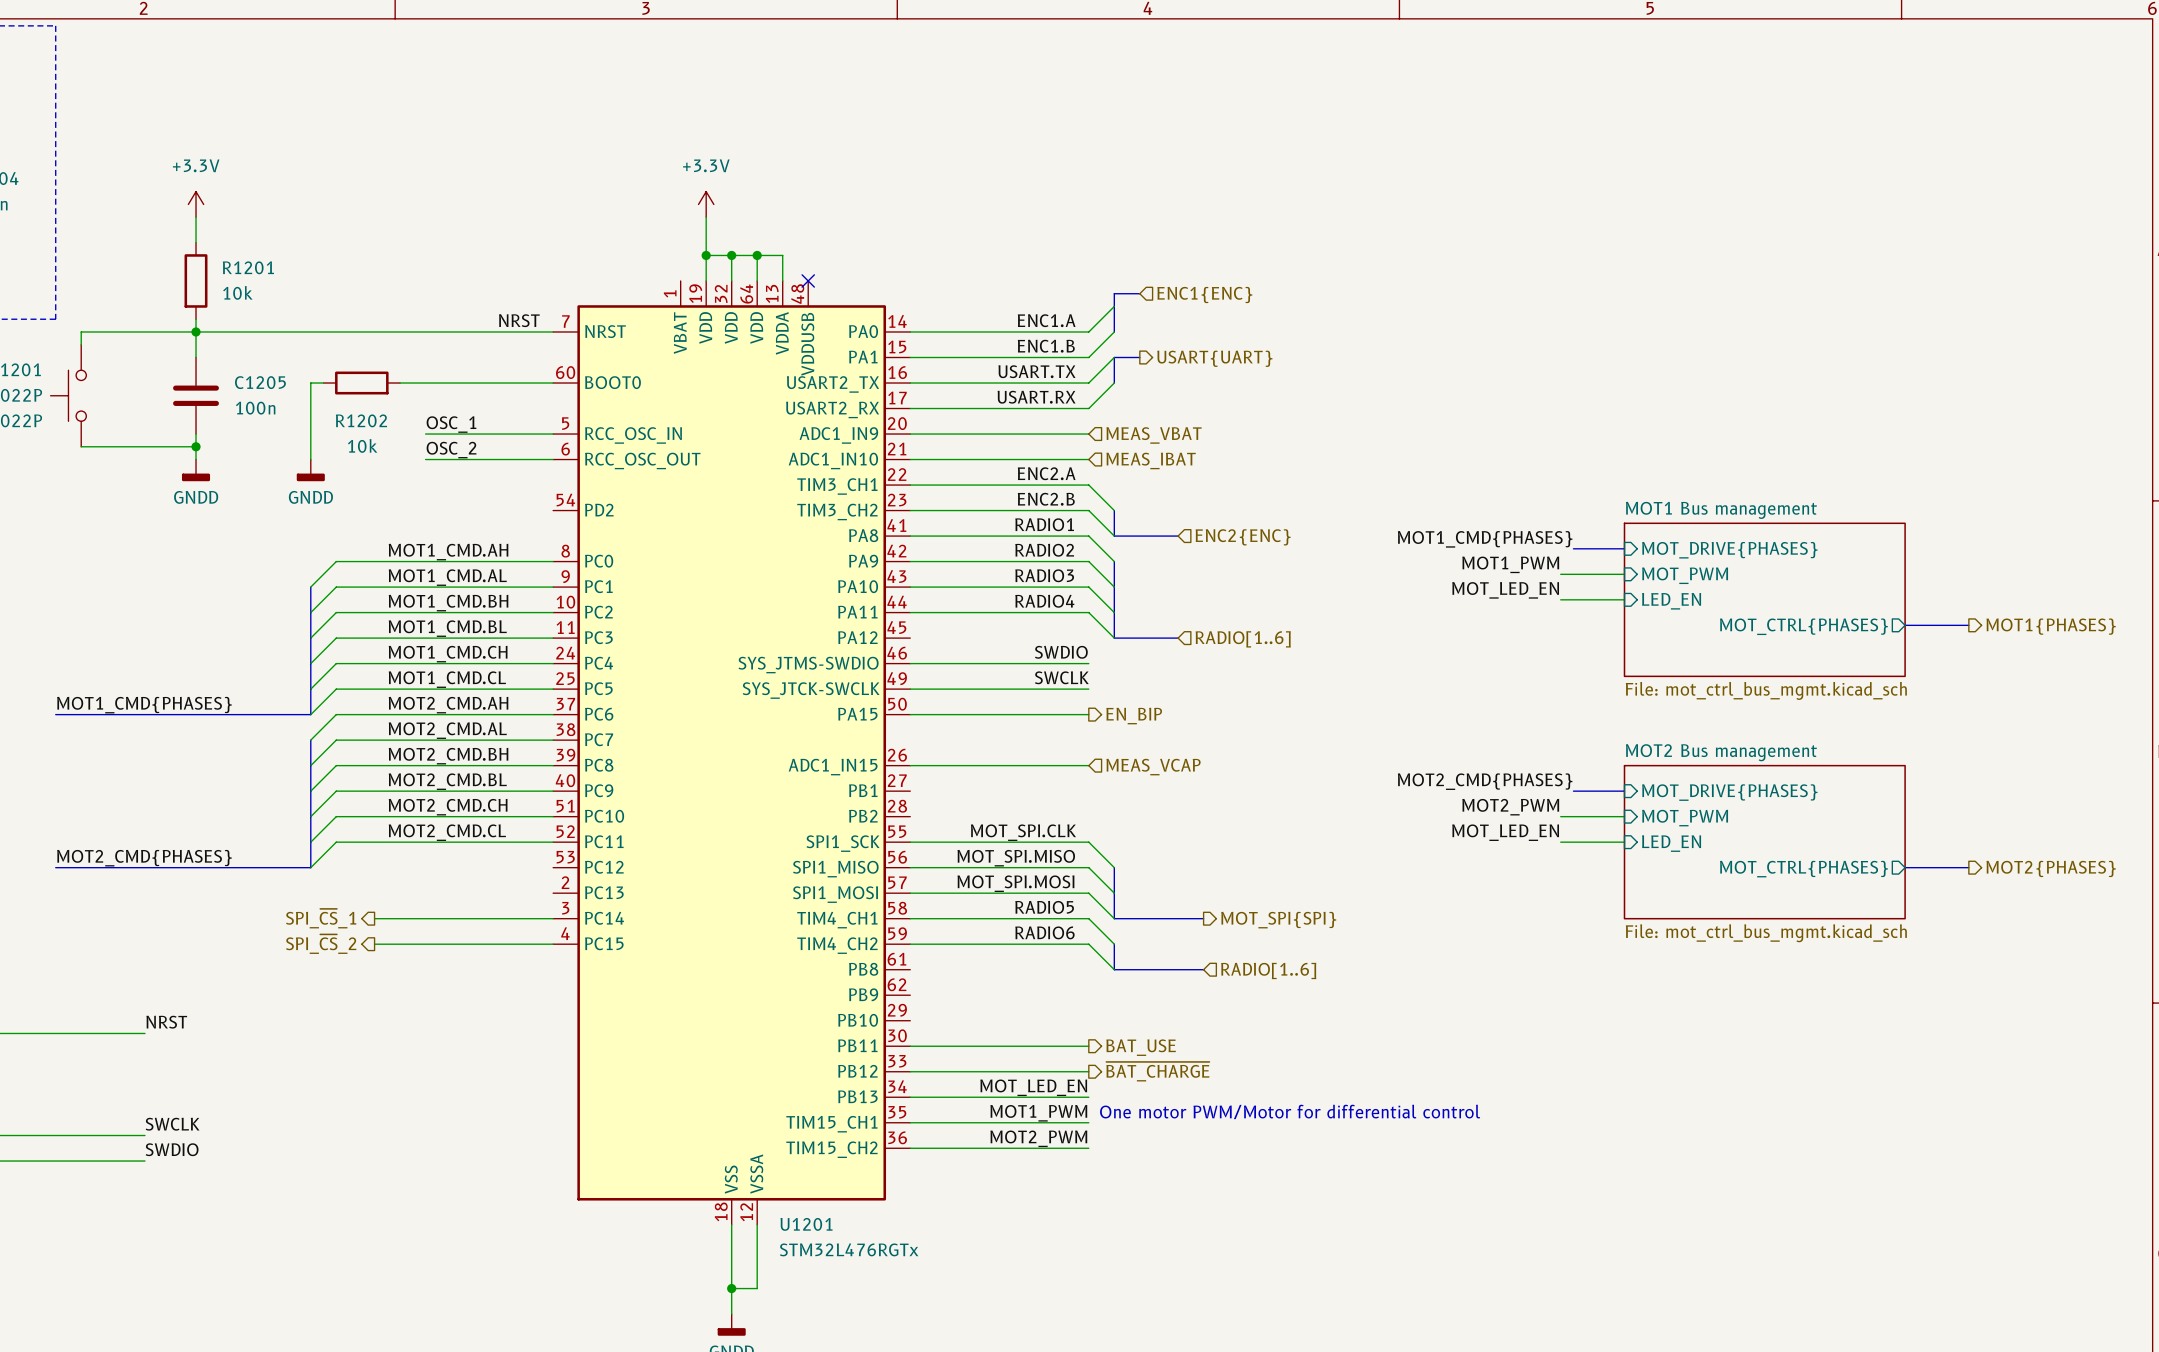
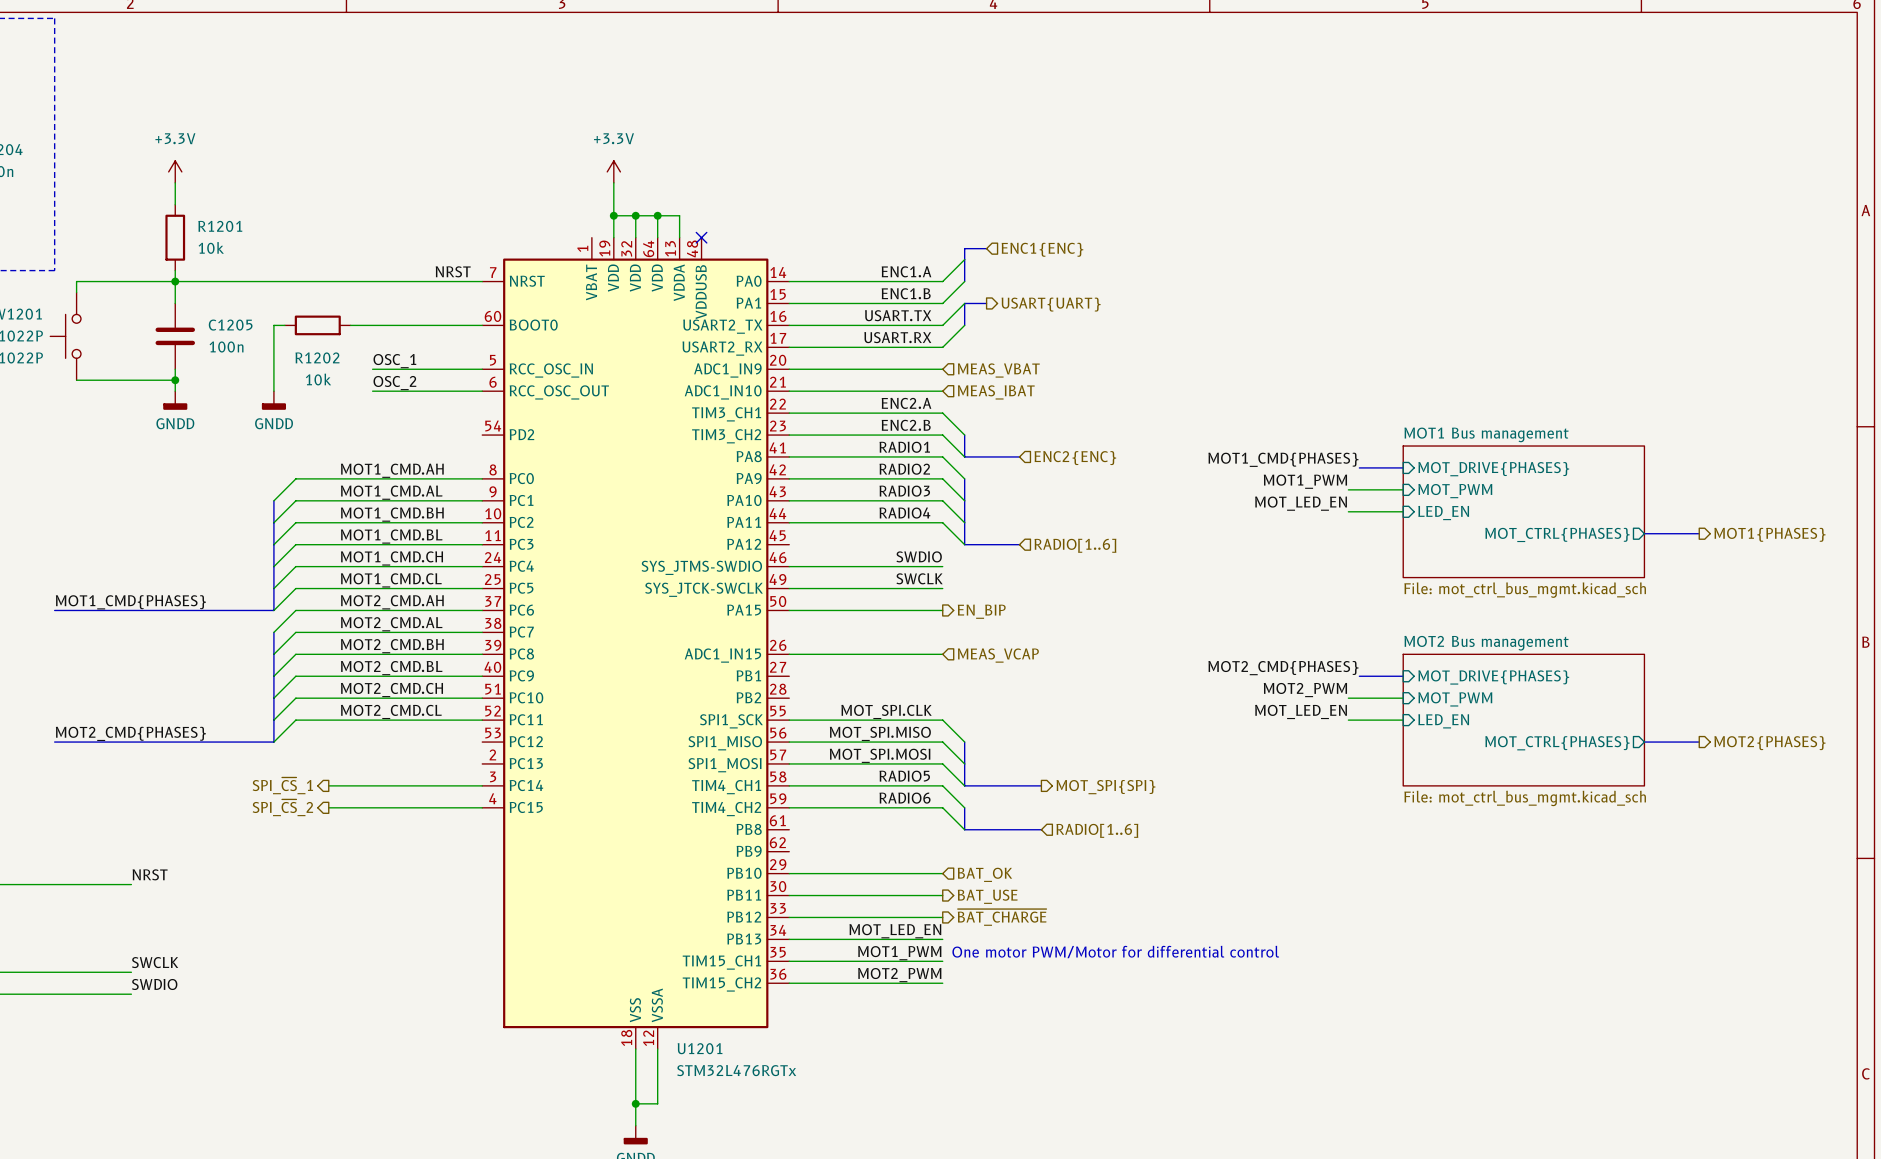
wire: none -> (789, 873) (942, 873)
hierarchical label: none -> BAT_OK (984, 874)

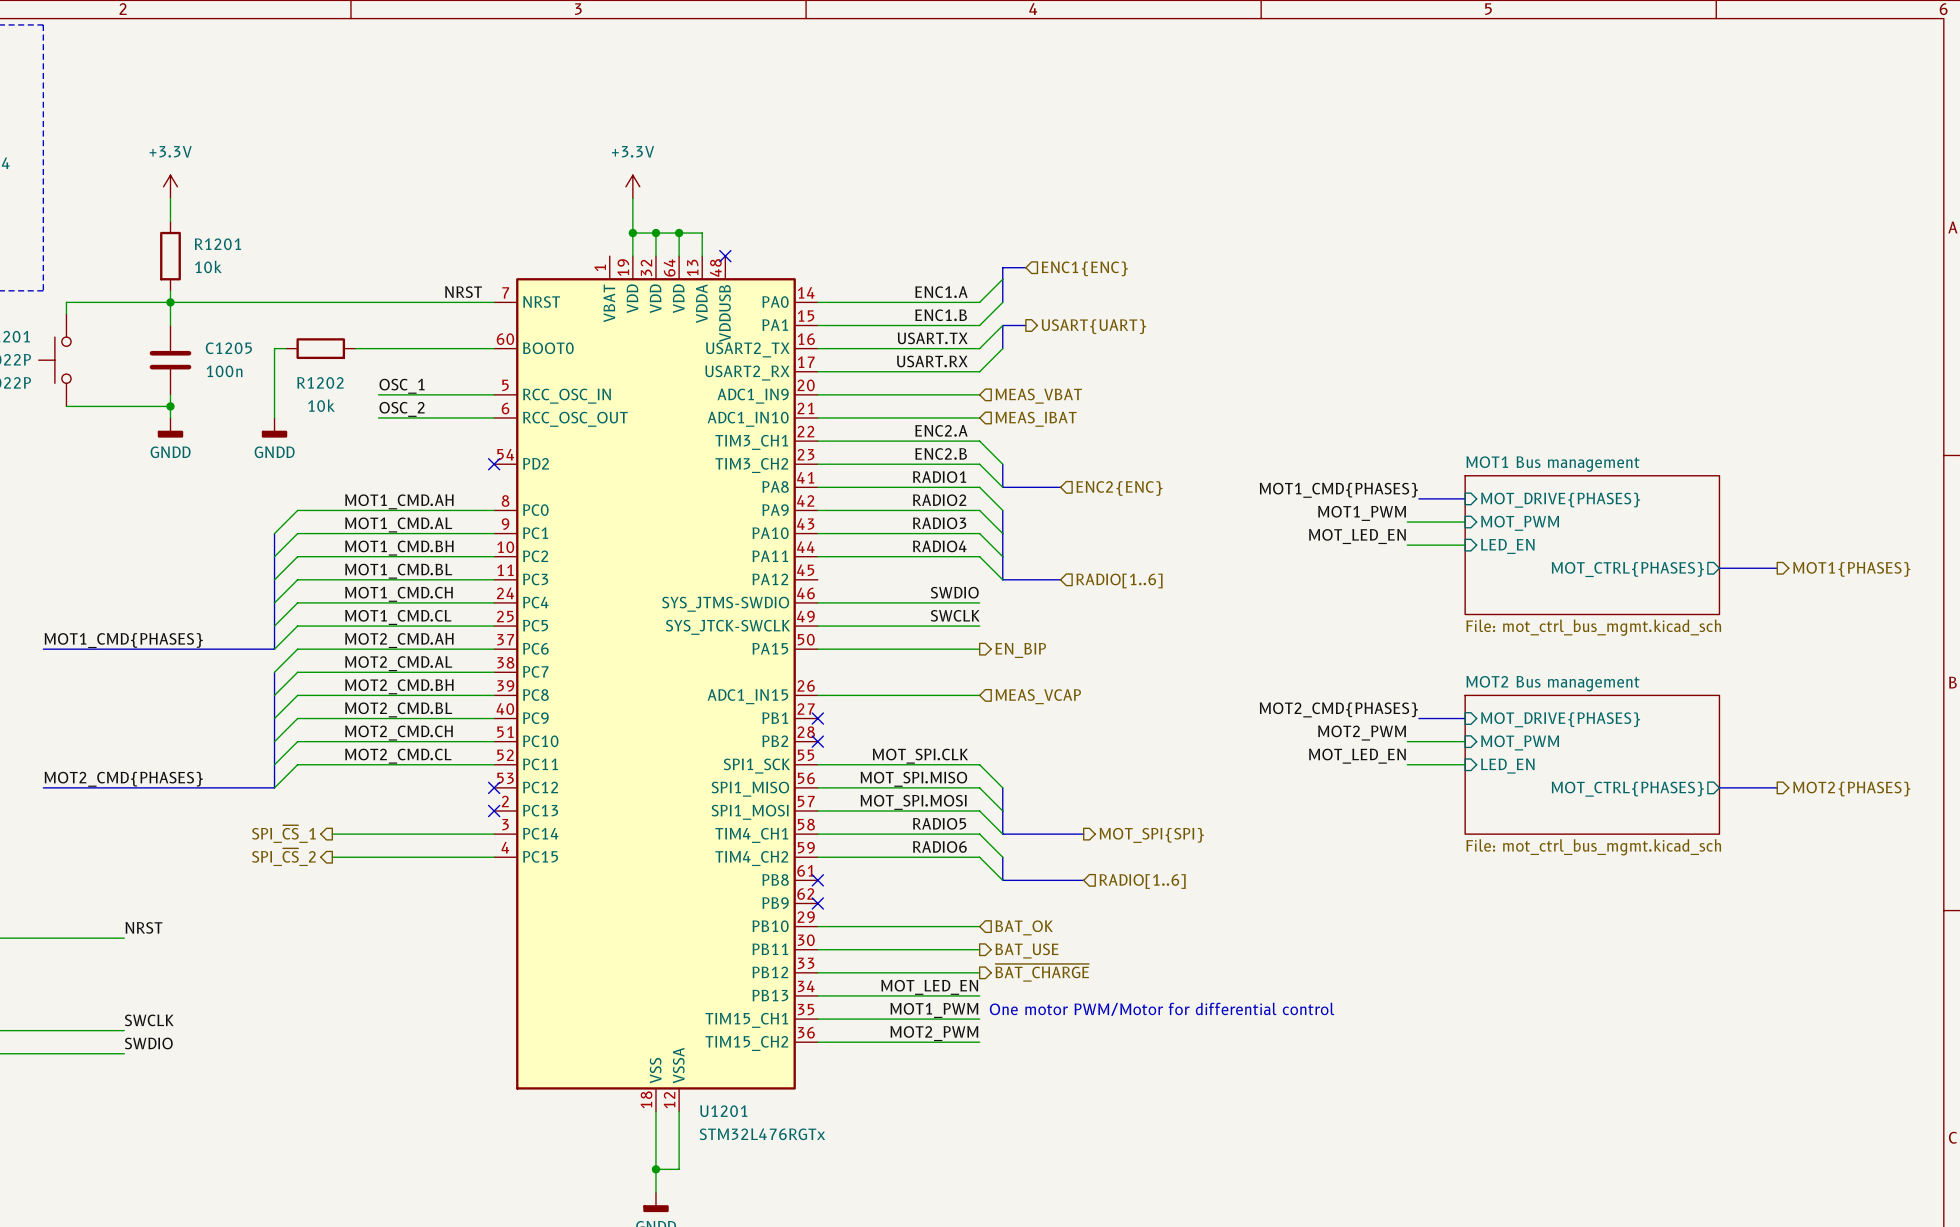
no-connect mark: none -> (494, 464)
no-connect mark: none -> (817, 718)
no-connect mark: none -> (817, 741)
no-connect mark: none -> (494, 787)
no-connect mark: none -> (494, 811)
no-connect mark: none -> (817, 880)
no-connect mark: none -> (817, 903)

